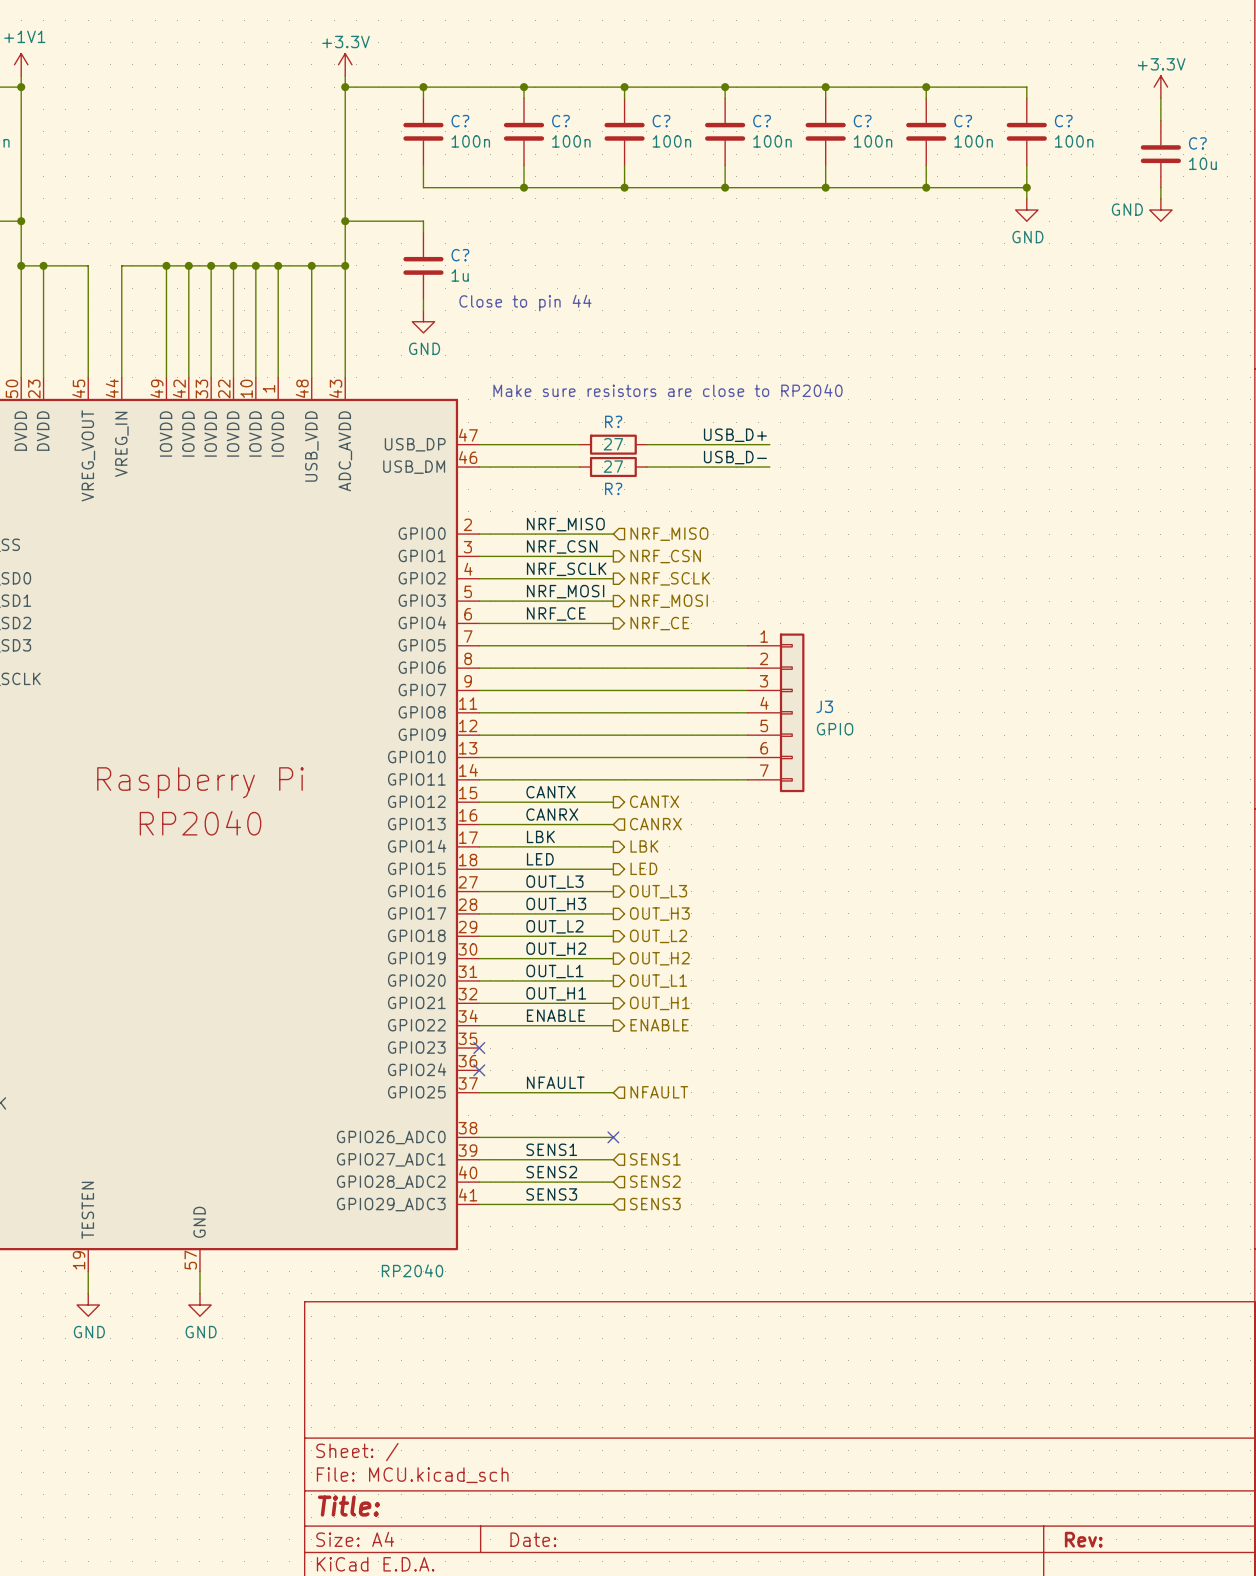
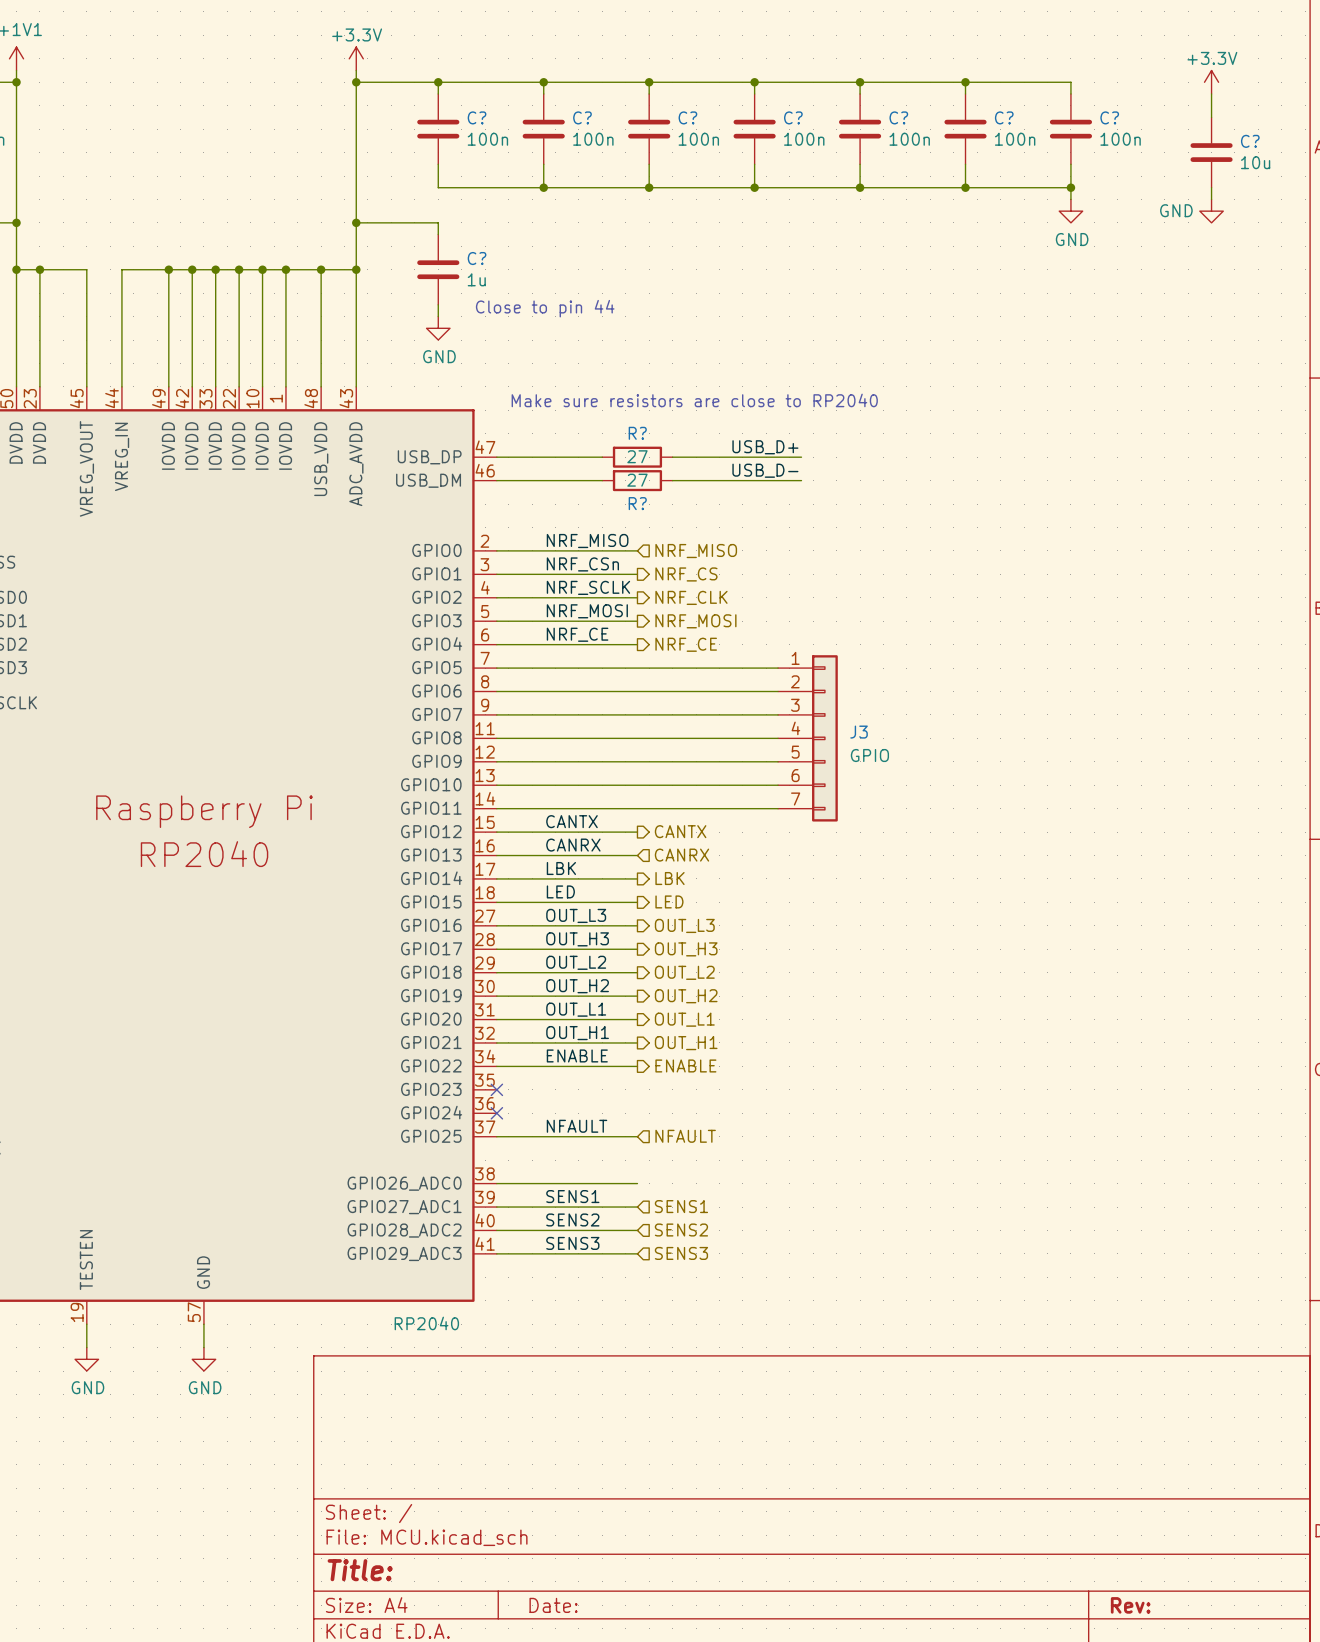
label: NRF_CSN (562, 546) -> NRF_CSn (582, 564)
hierarchical label: NRF_CSN (665, 556) -> NRF_CS (686, 574)
hierarchical label: NRF_SCLK (670, 578) -> NRF_CLK (691, 597)
no-connect mark: (613, 1137) -> none

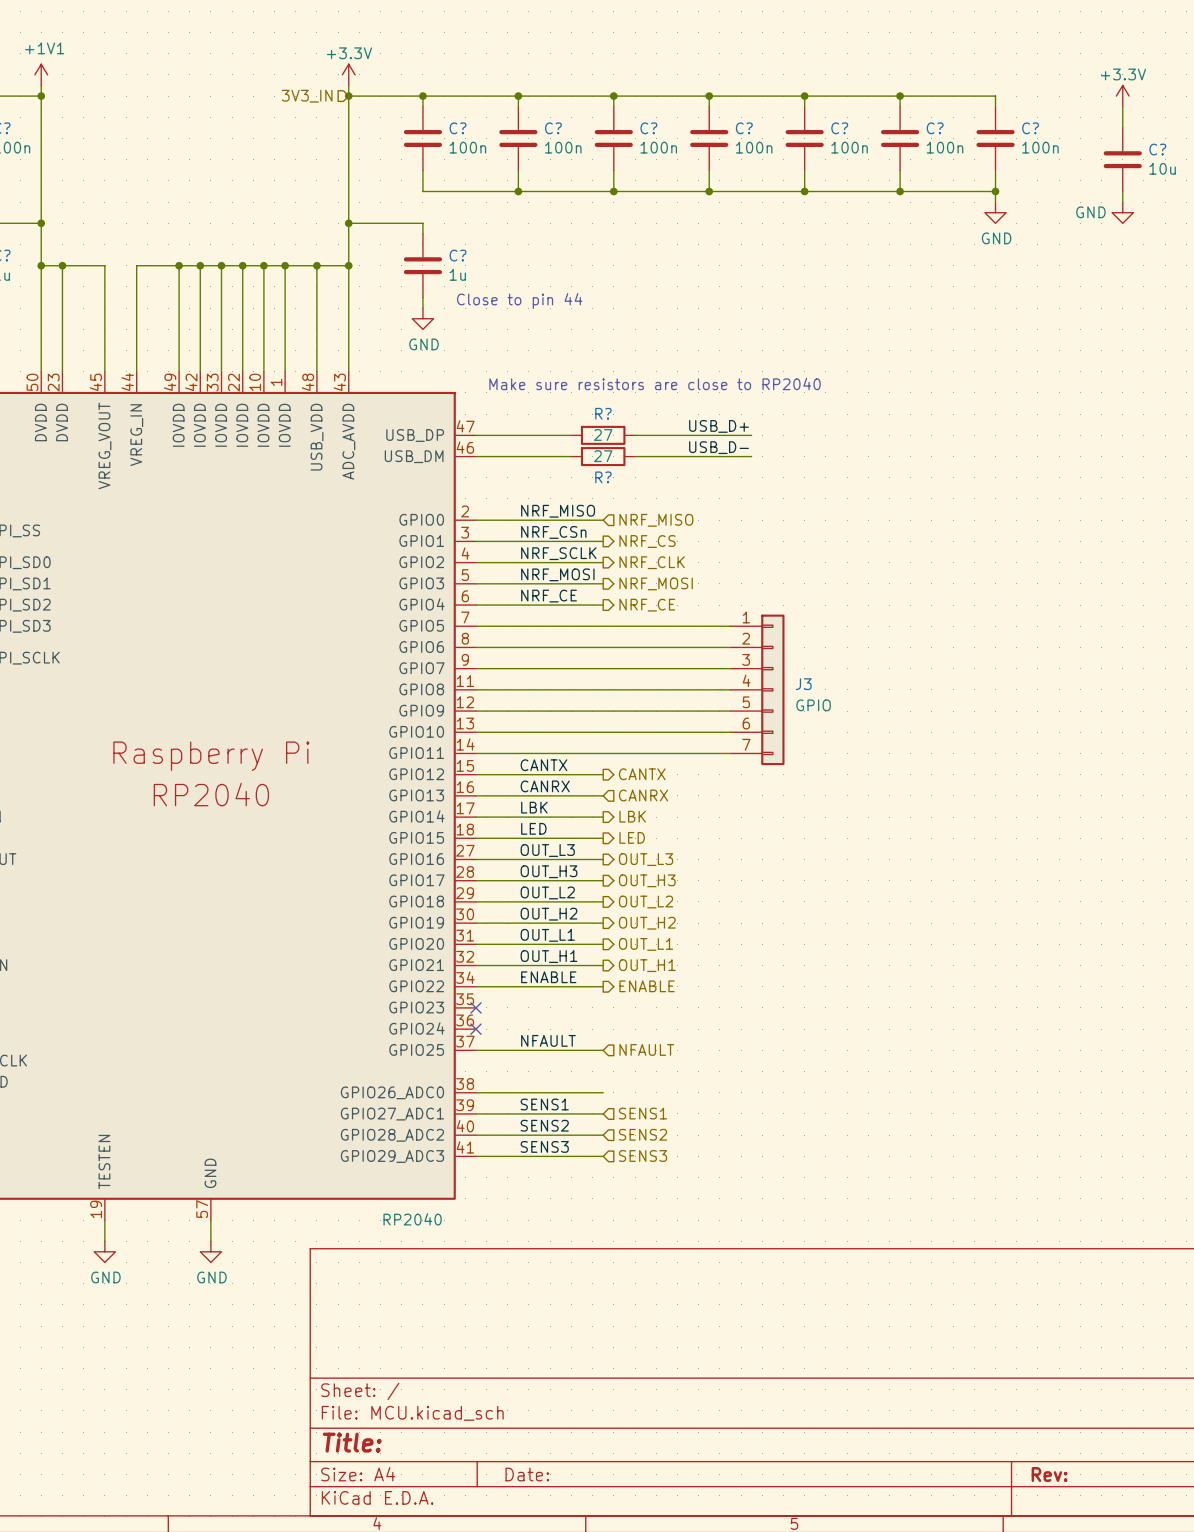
hierarchical label: none -> 3V3_IN (307, 96)

